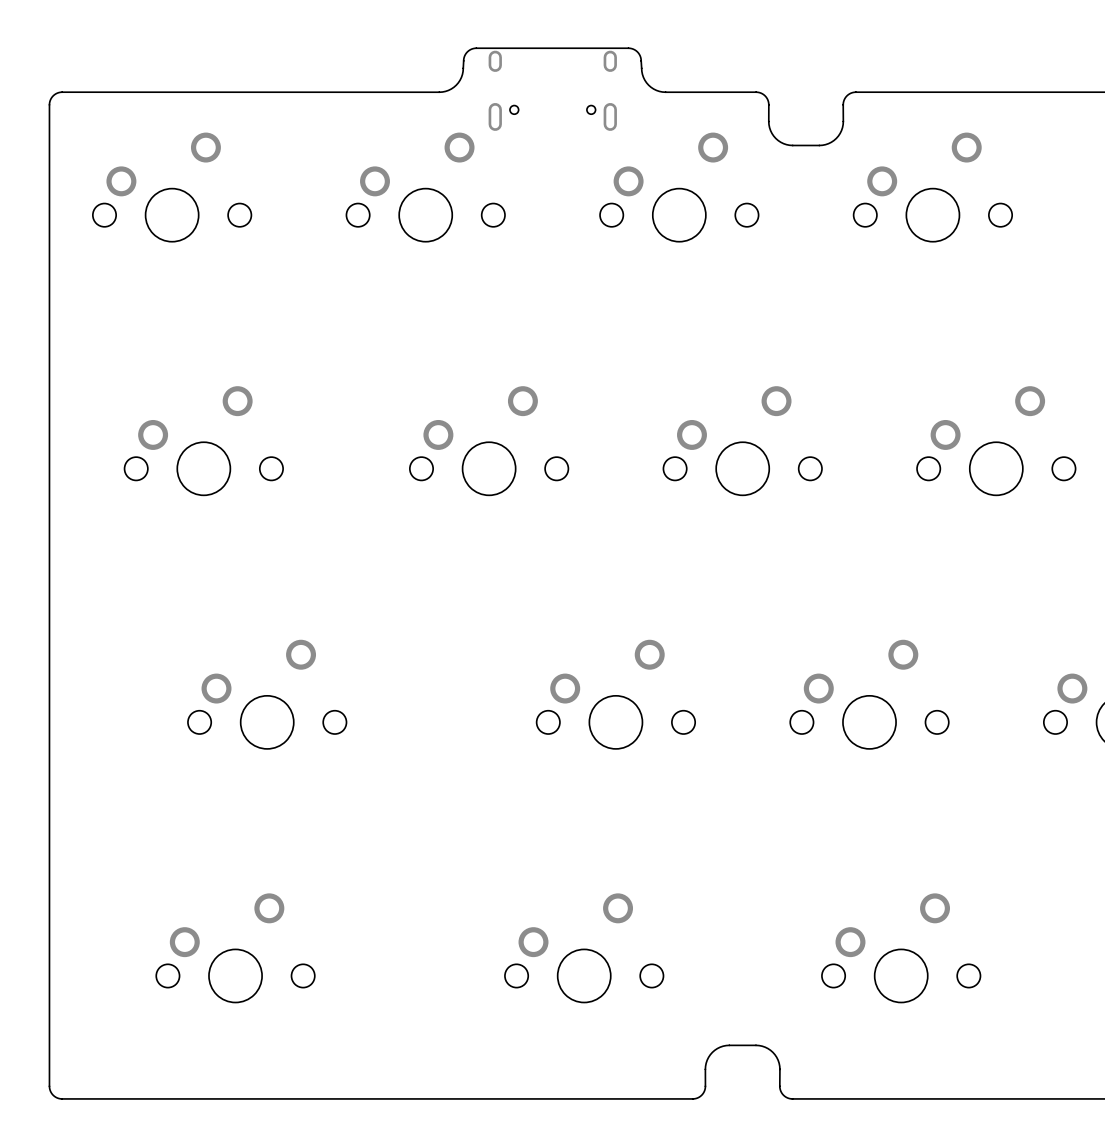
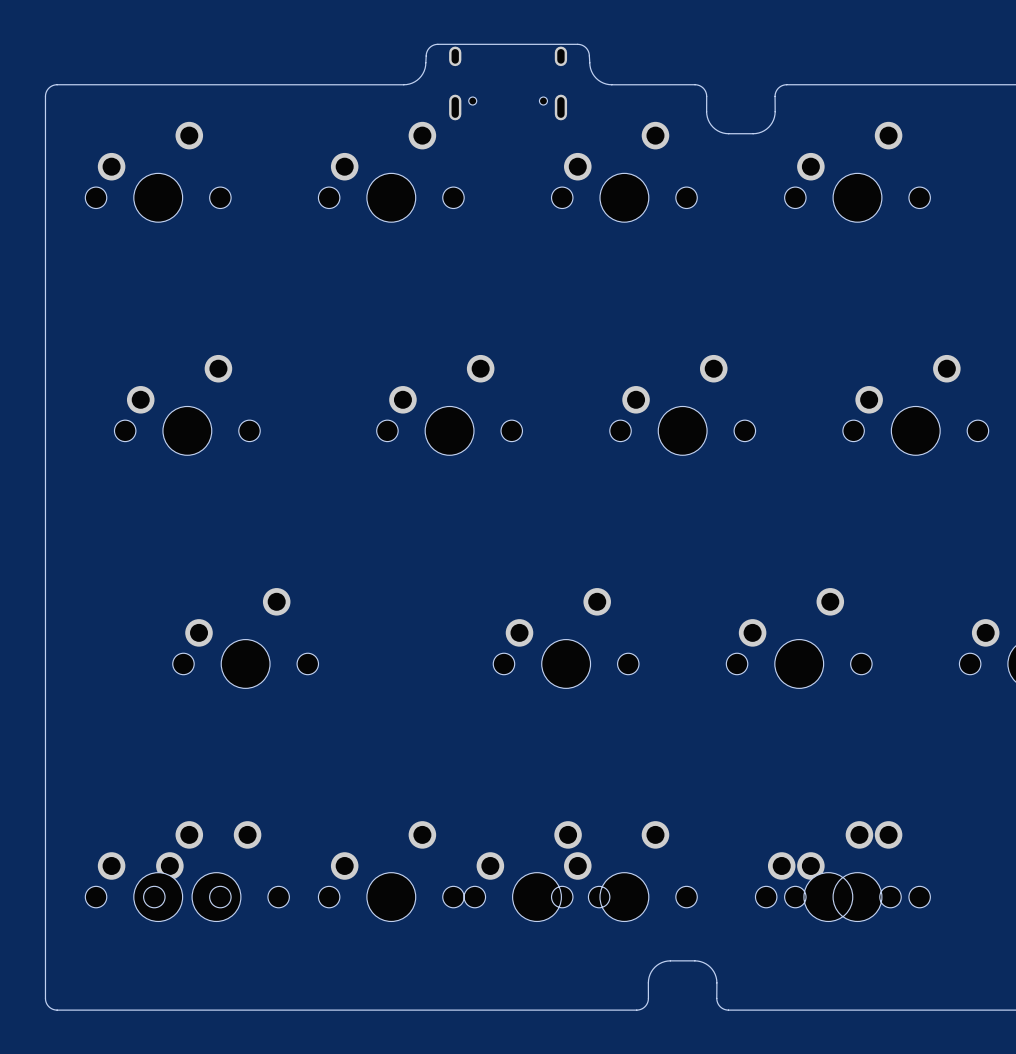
part: none -> (158, 871)
part: none -> (391, 871)
part: none -> (624, 871)
part: none -> (857, 871)

